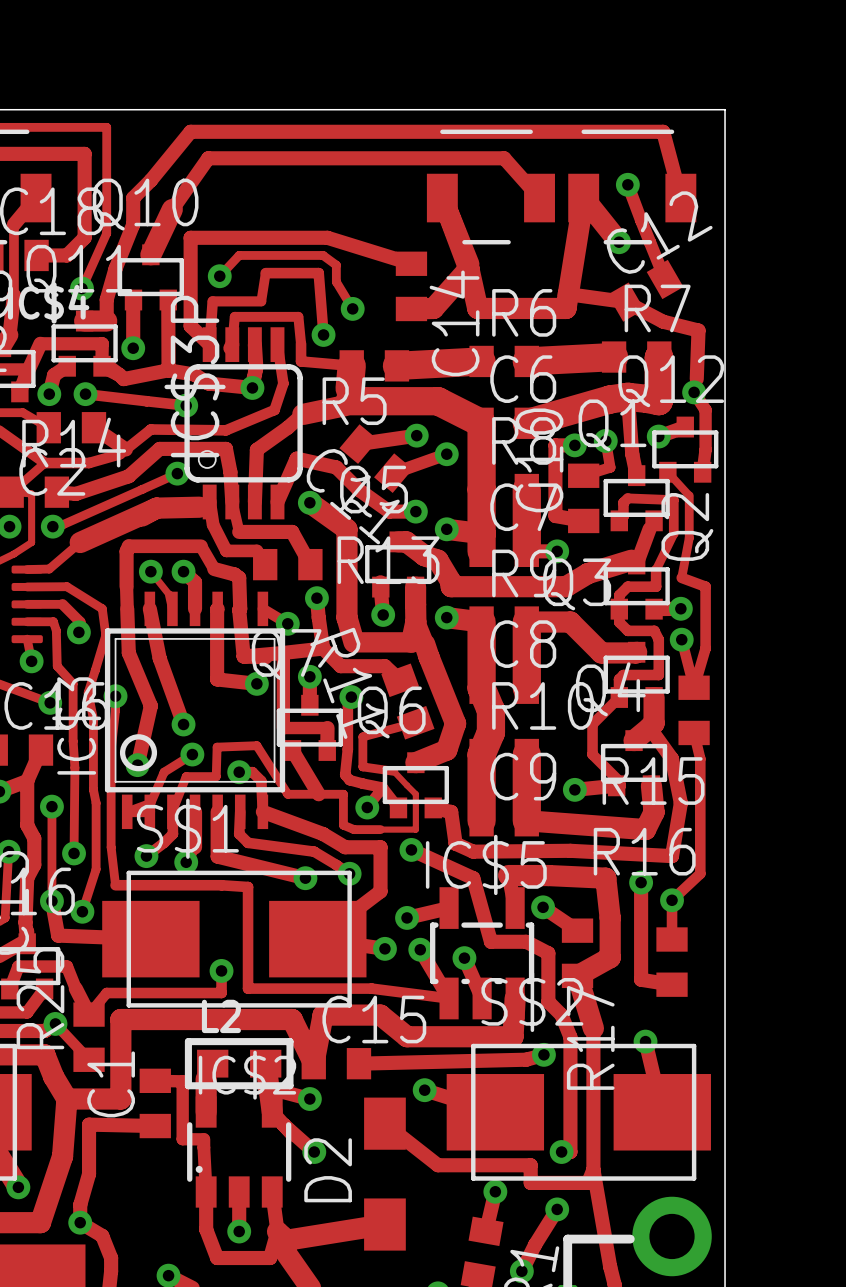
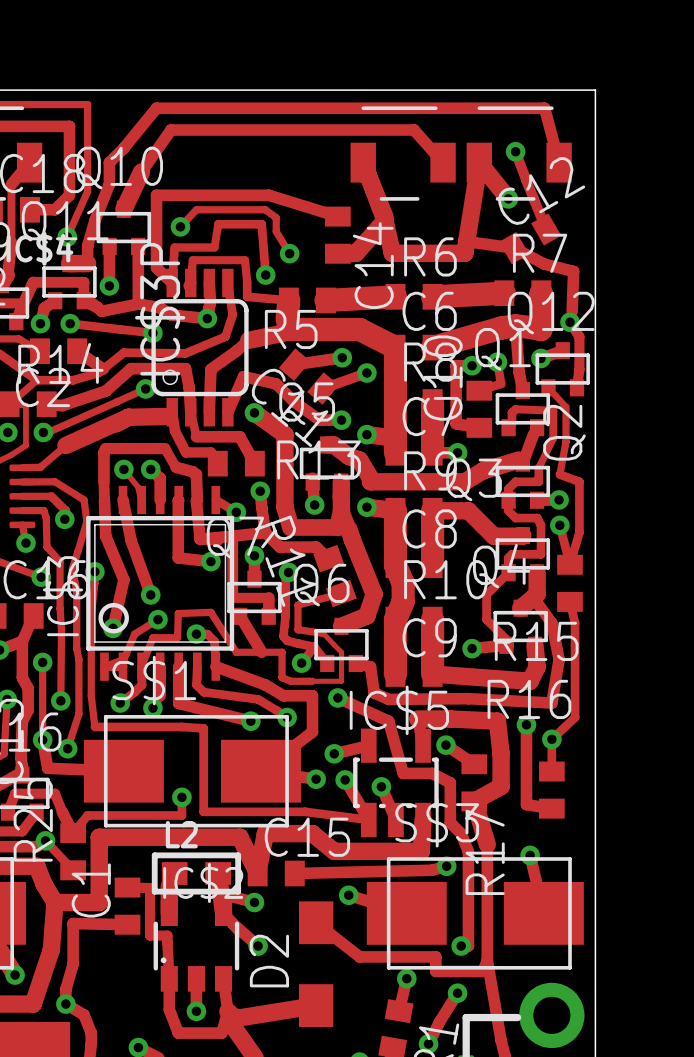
S$2 name: S$2 (532, 1001) -> S$3 (437, 822)

